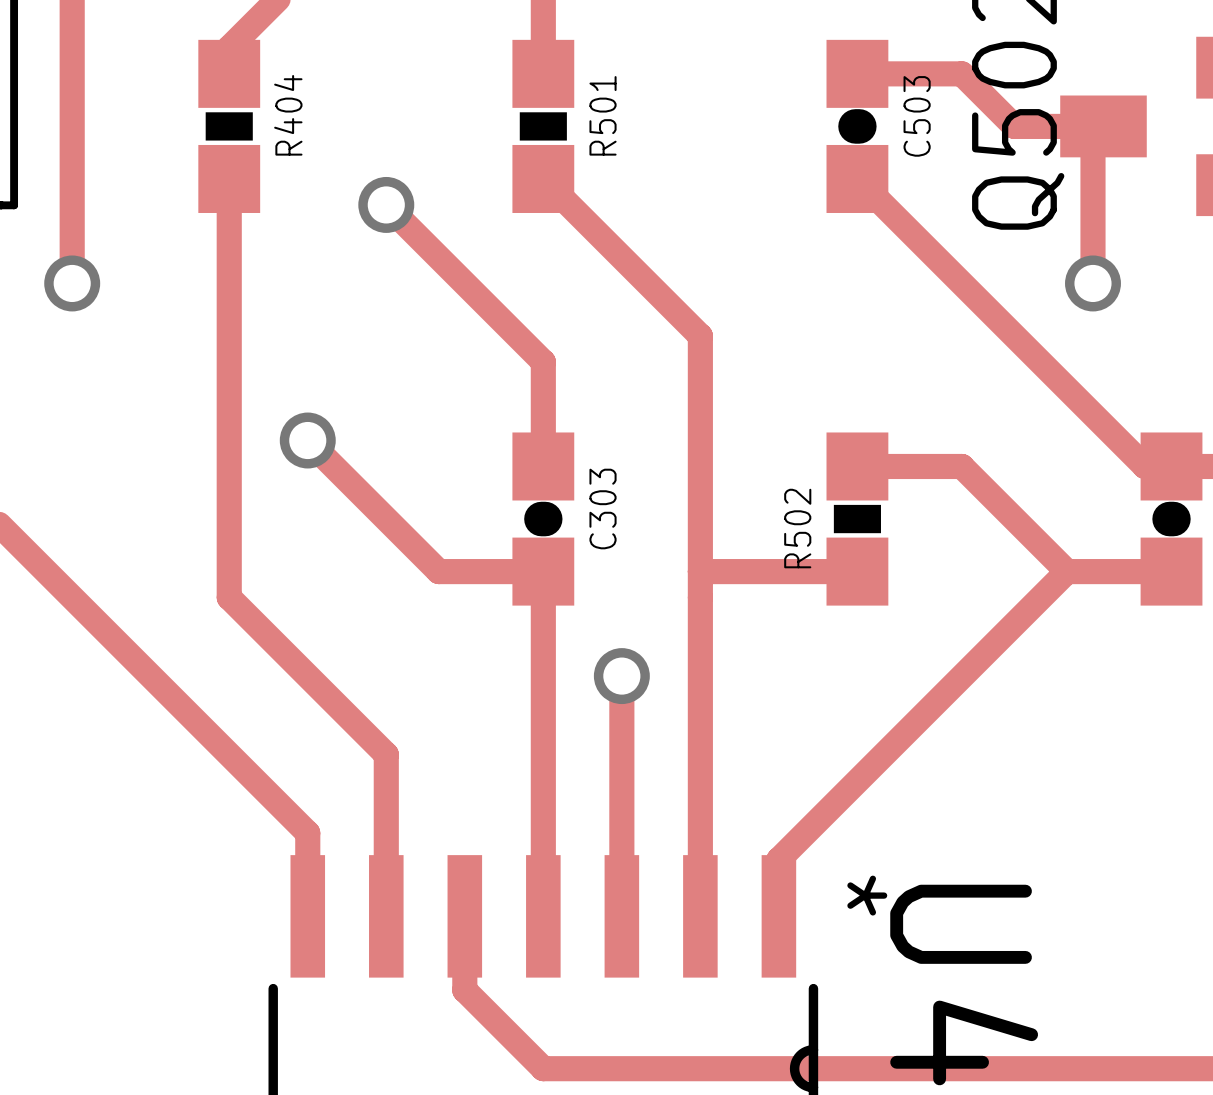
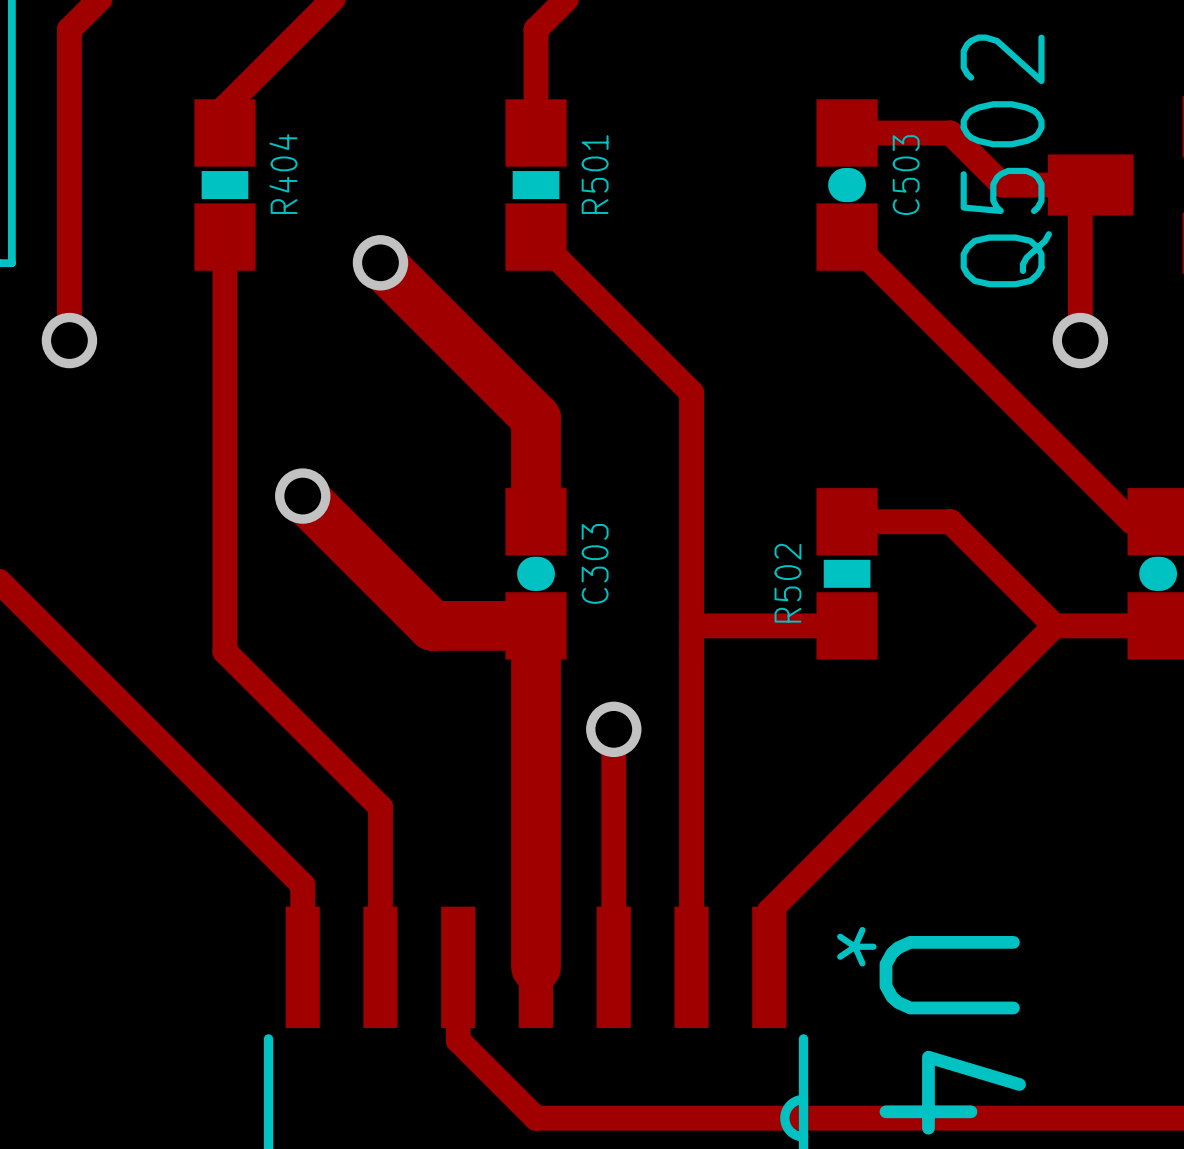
track width: thin (386, 204) (543, 361) (543, 466) -> thick (380, 262) (536, 418) (536, 521)
track width: thin (307, 440) (438, 571) (543, 571) (543, 916) -> thick (302, 496) (432, 625) (536, 625) (536, 967)

